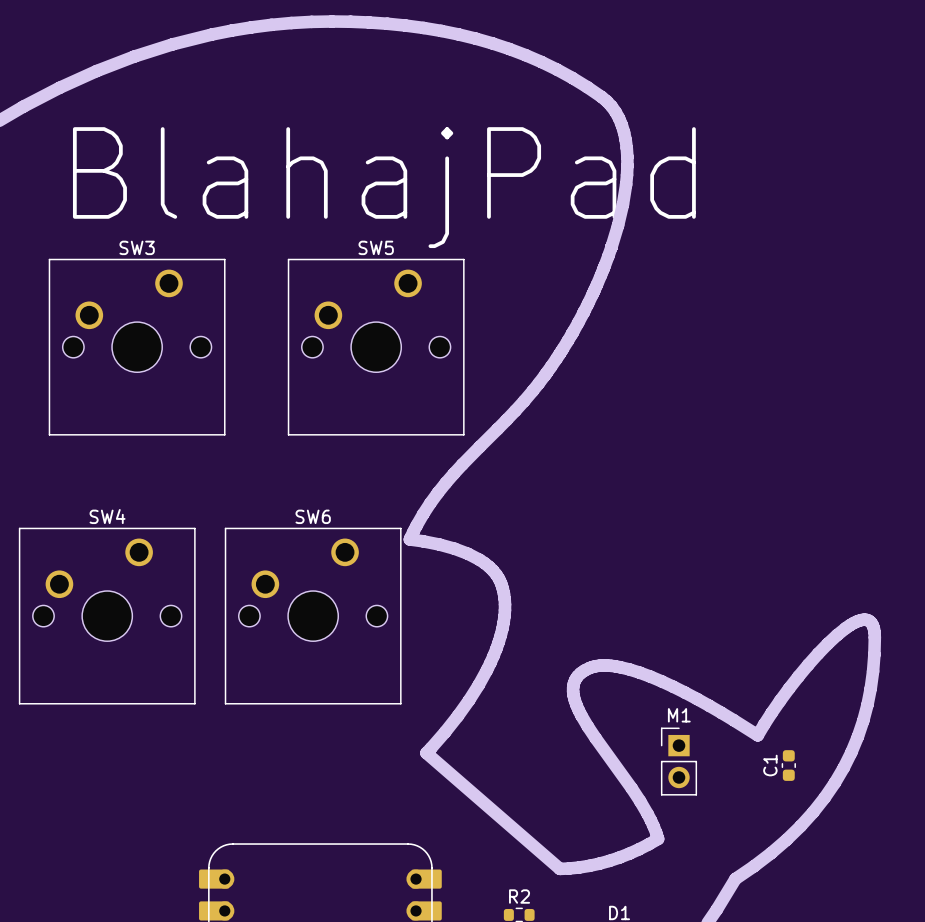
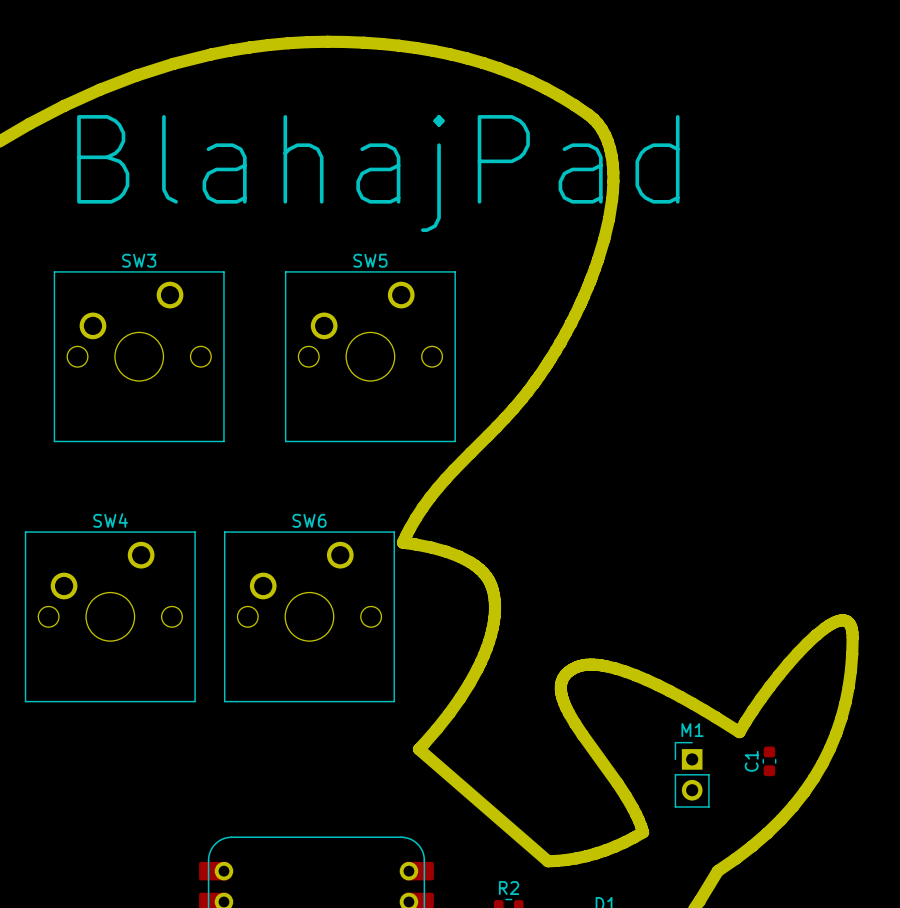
text position: BlahajPad (384, 187) -> BlahajPad (378, 173)
M1 position: (678, 761) -> (692, 774)

